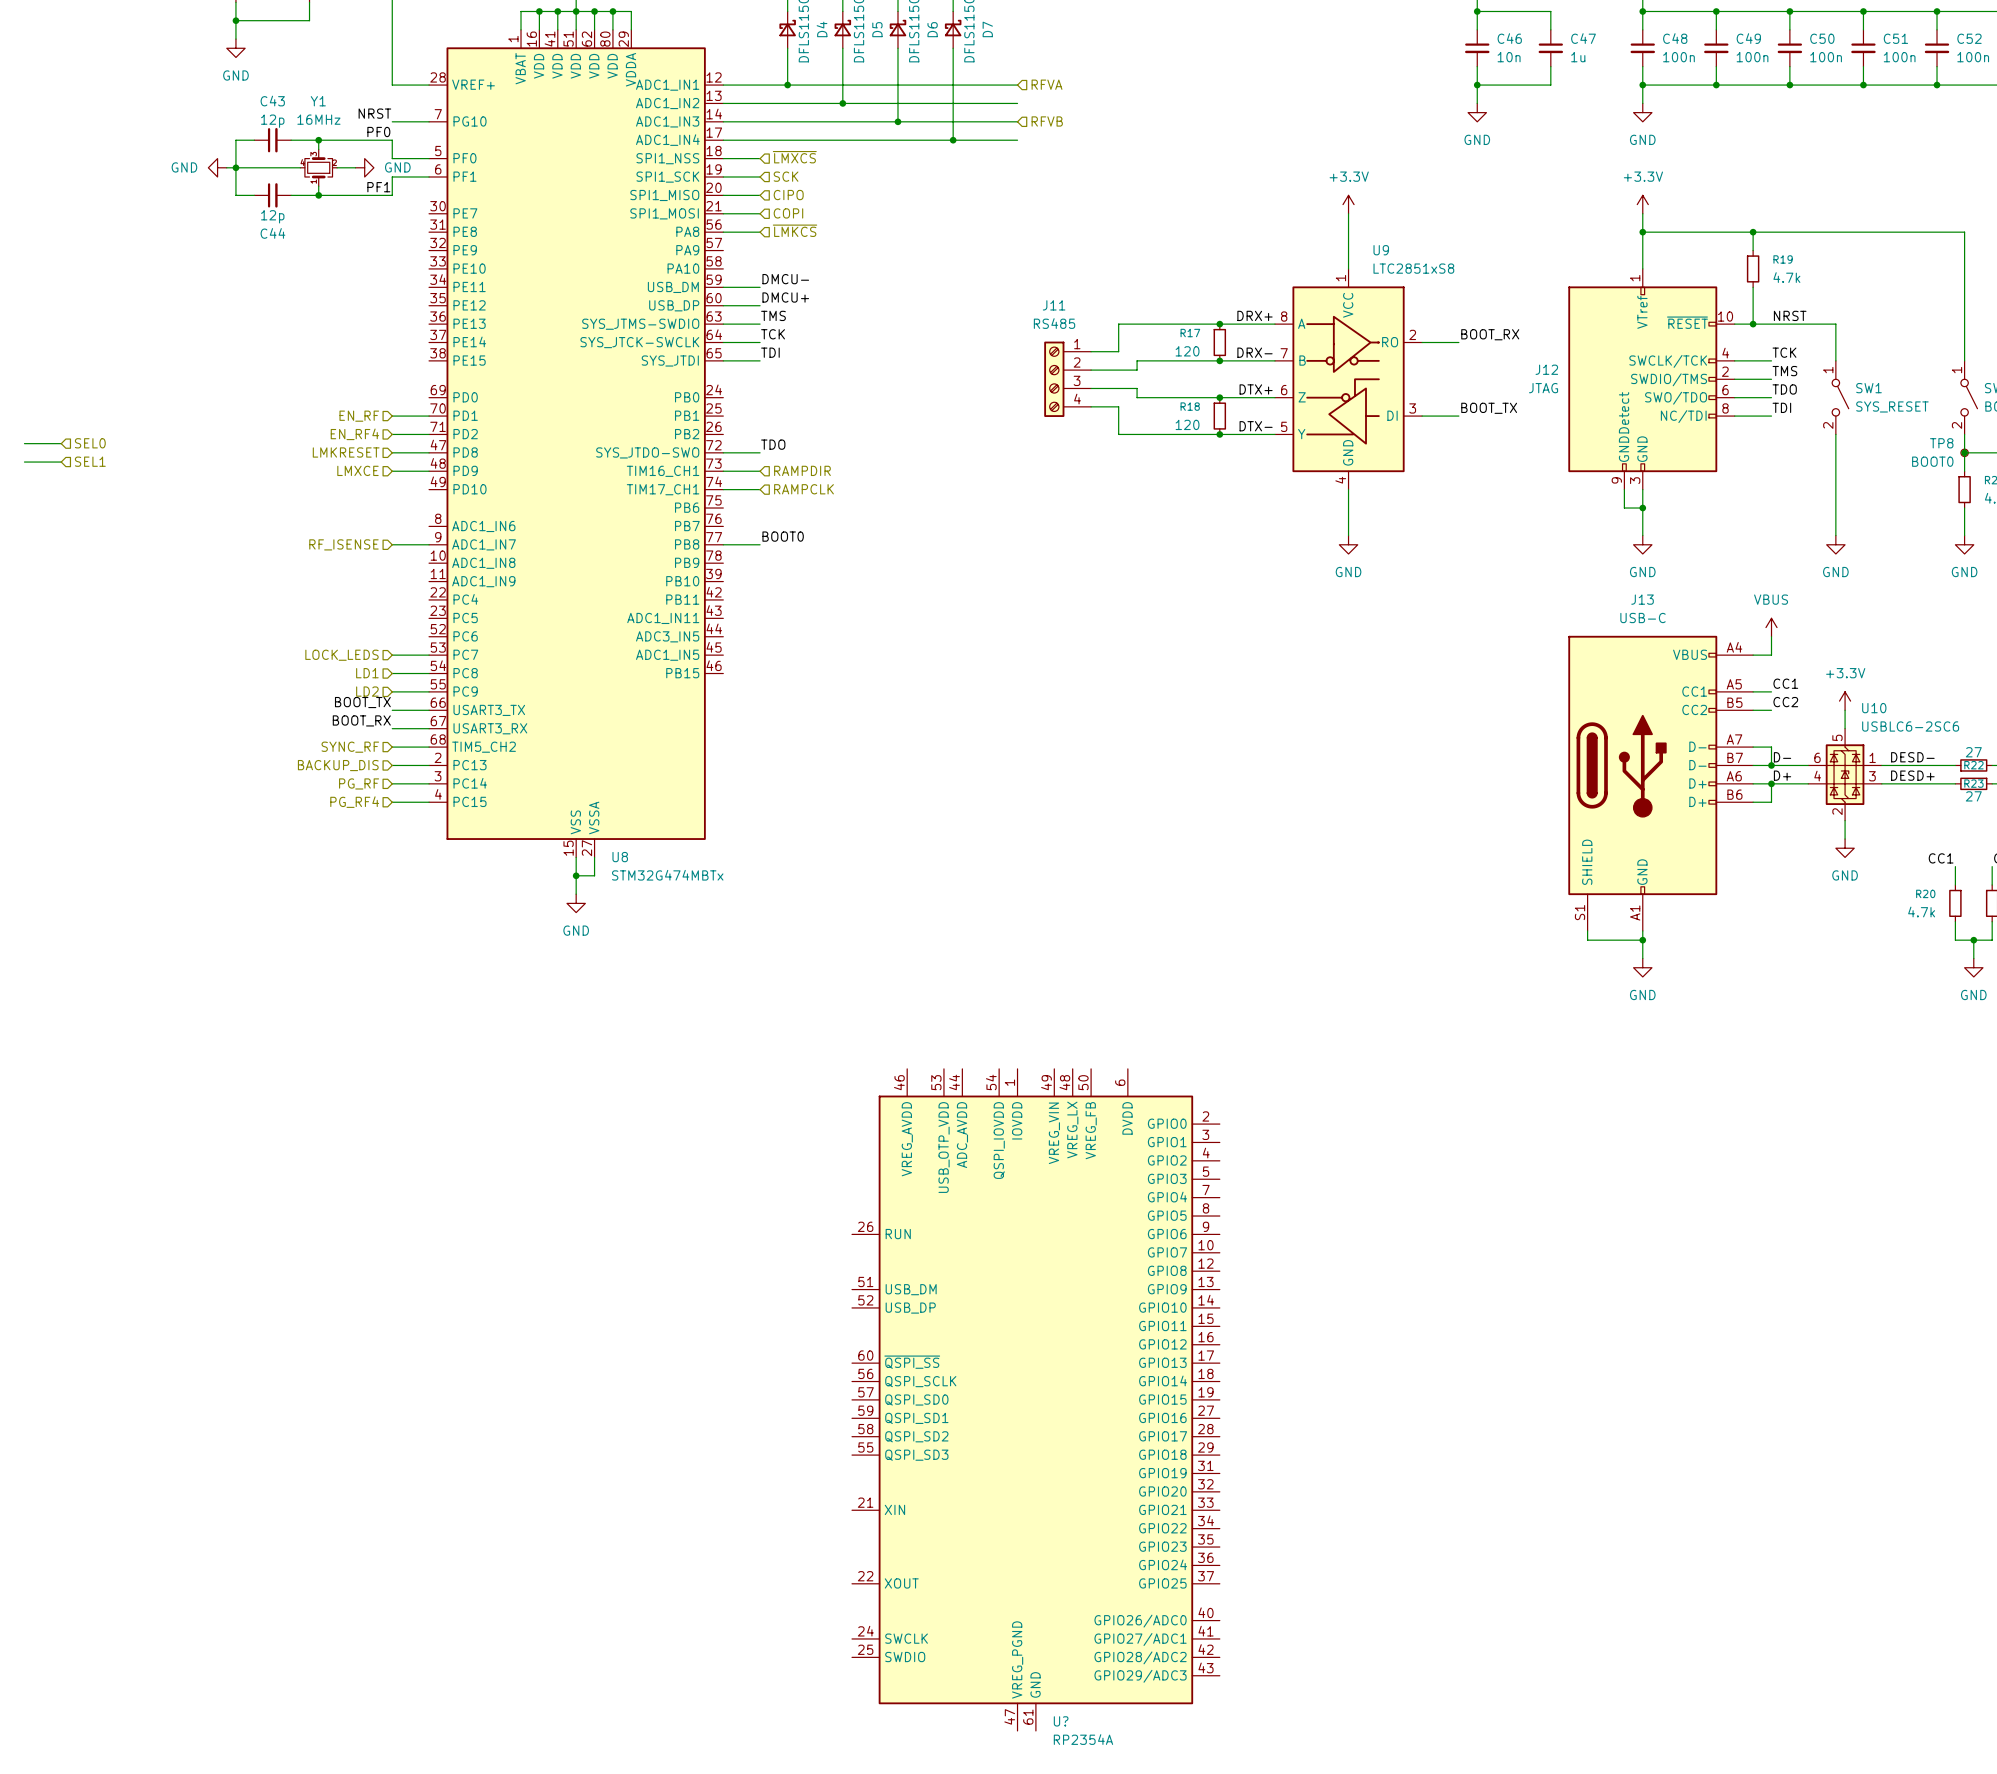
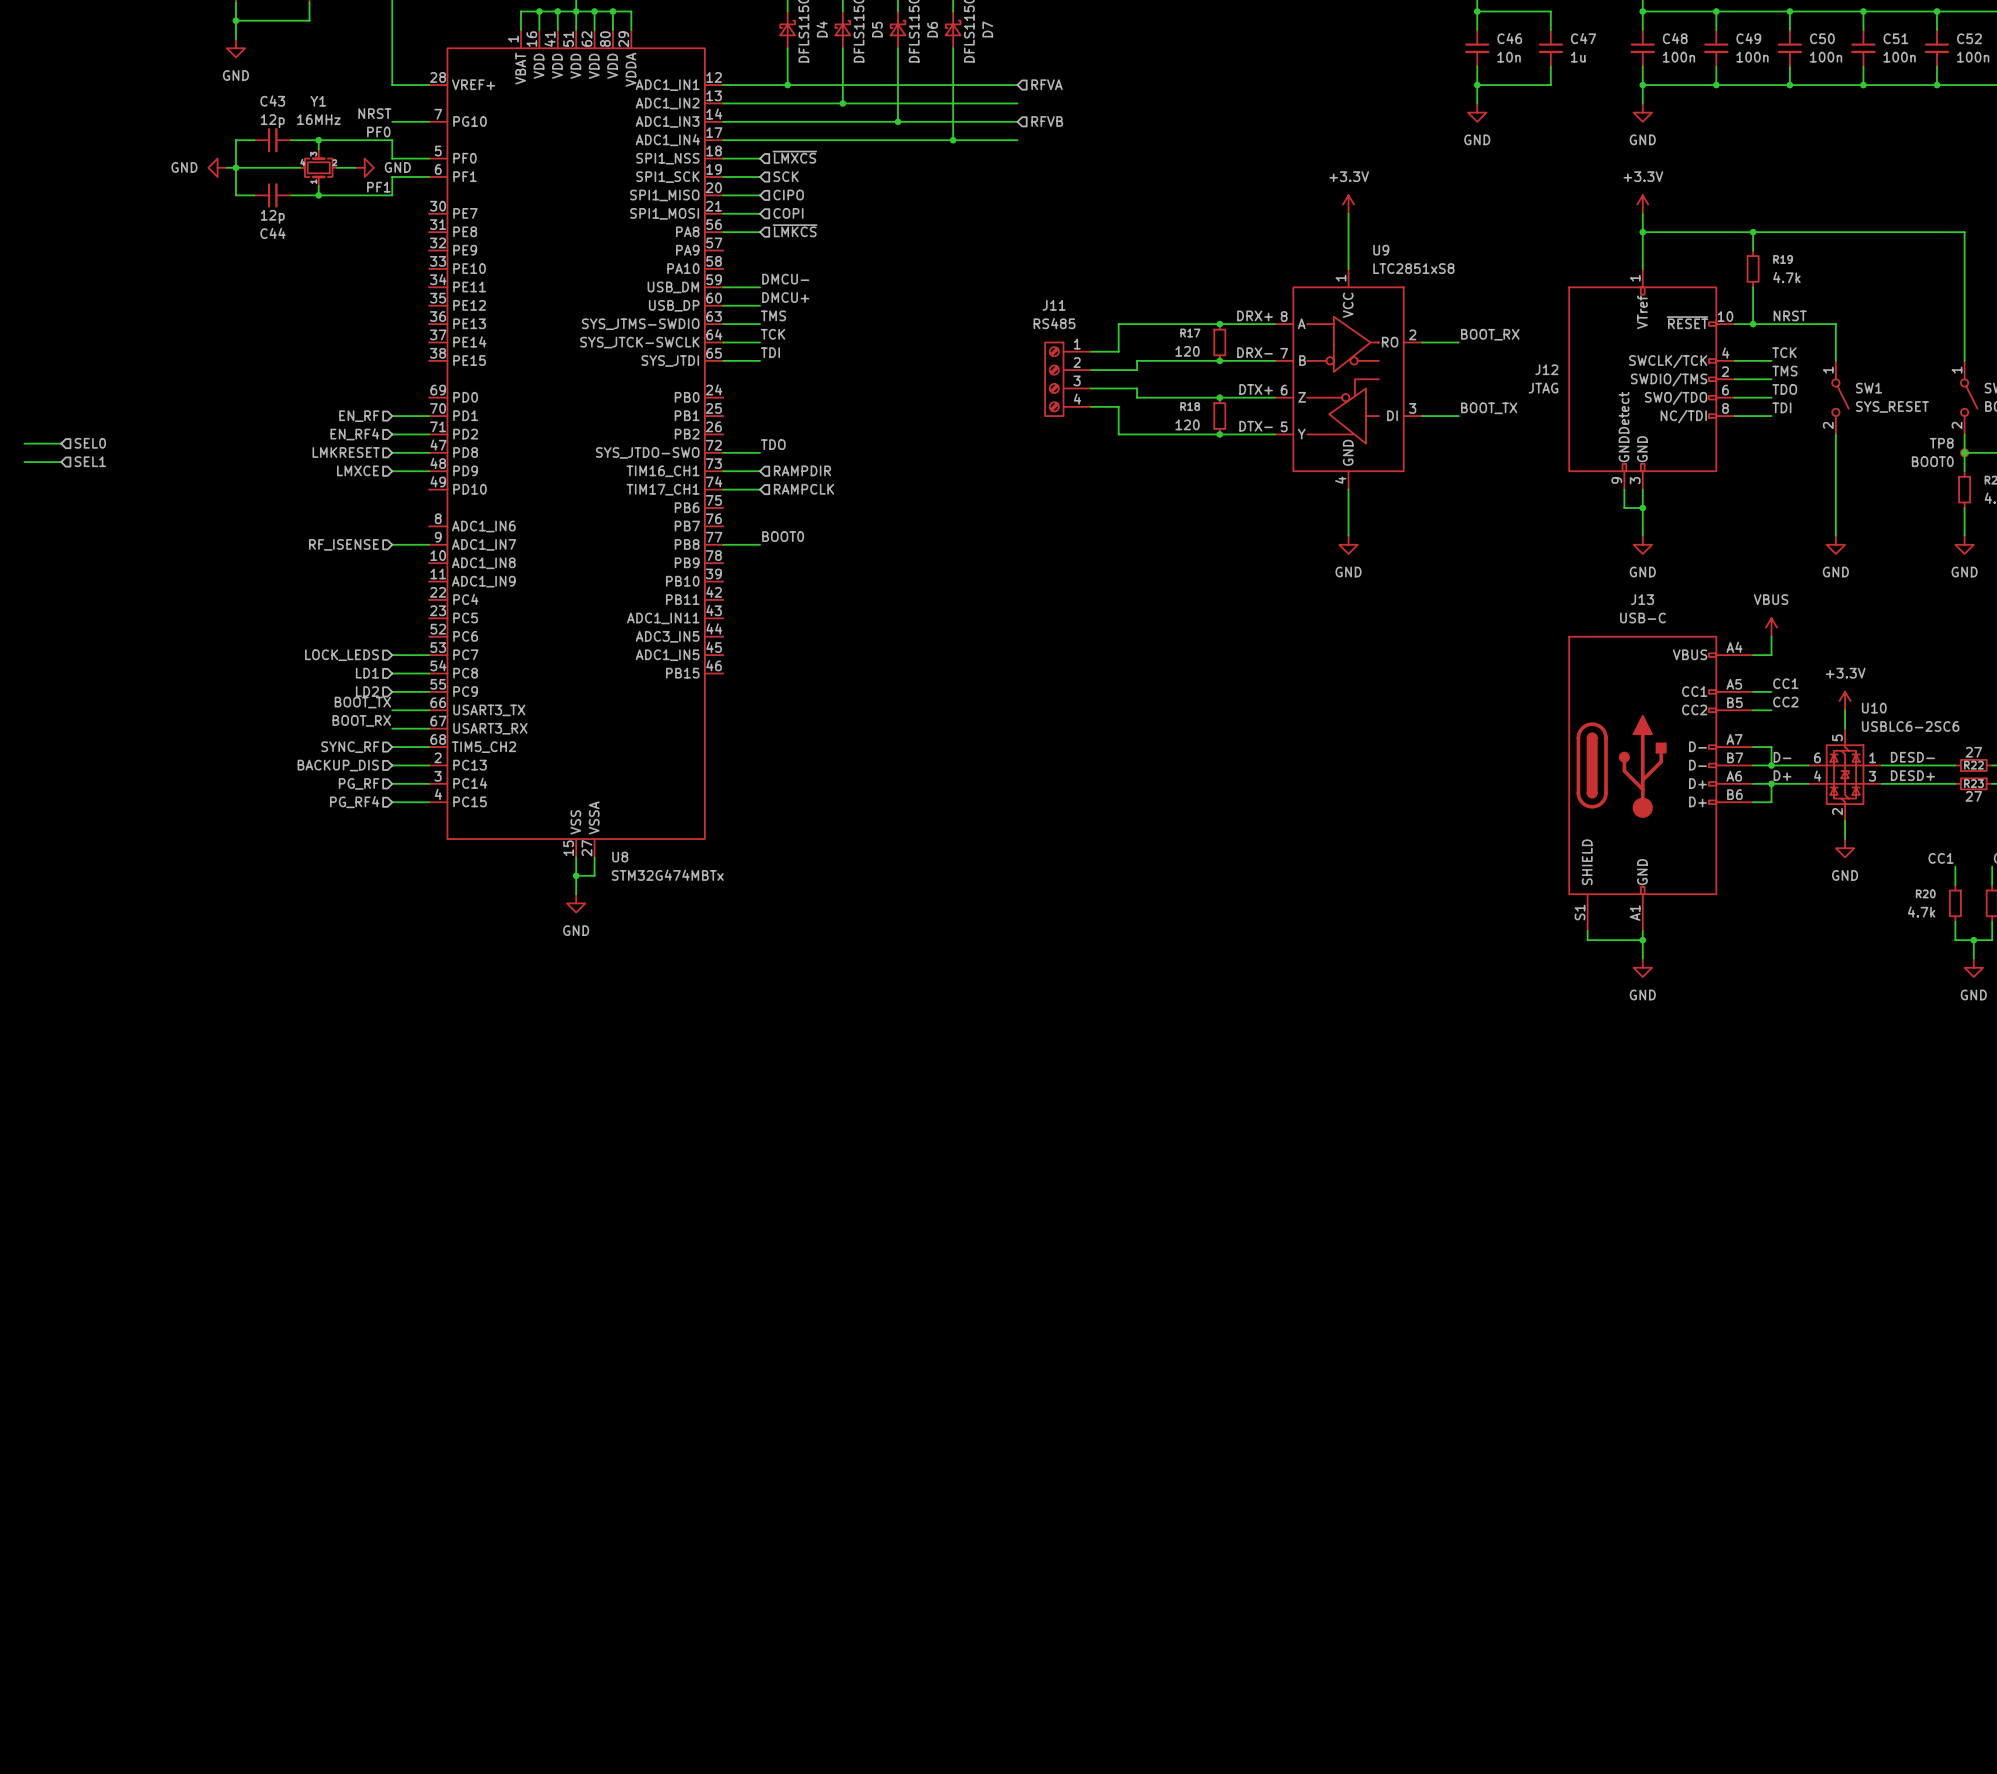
U?: RP2354A (1035, 1399) -> none

